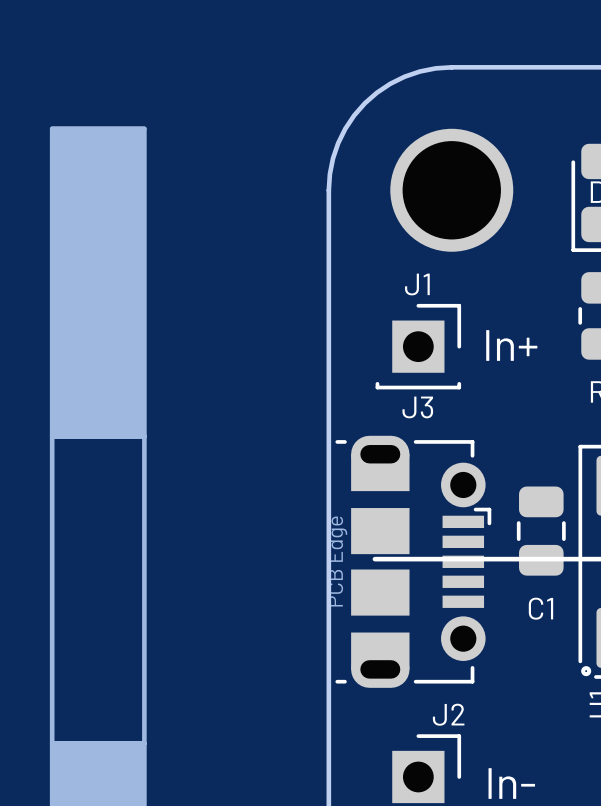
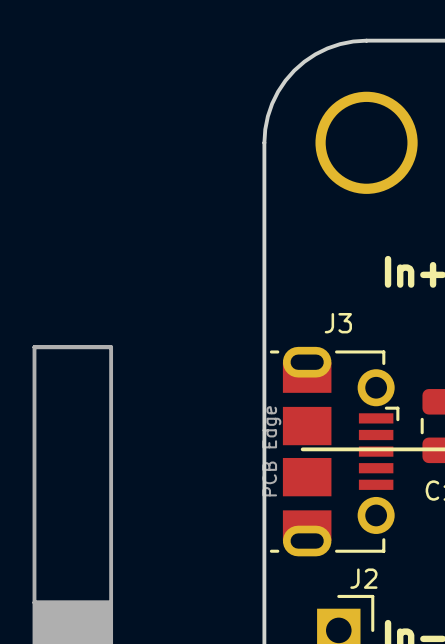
drawing: [49, 126, 147, 439] -> none
J1: (418, 346) -> none

